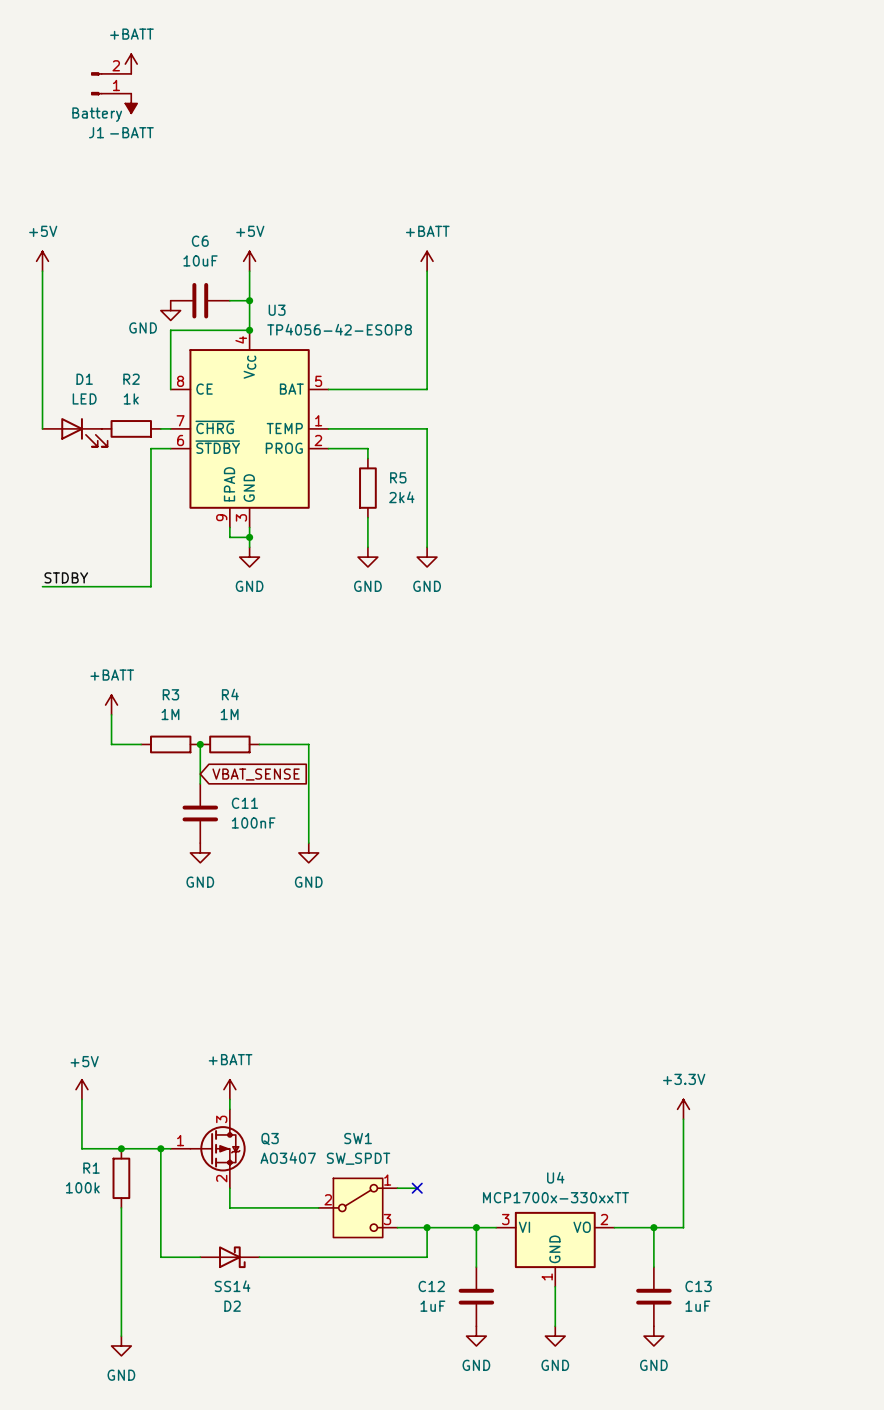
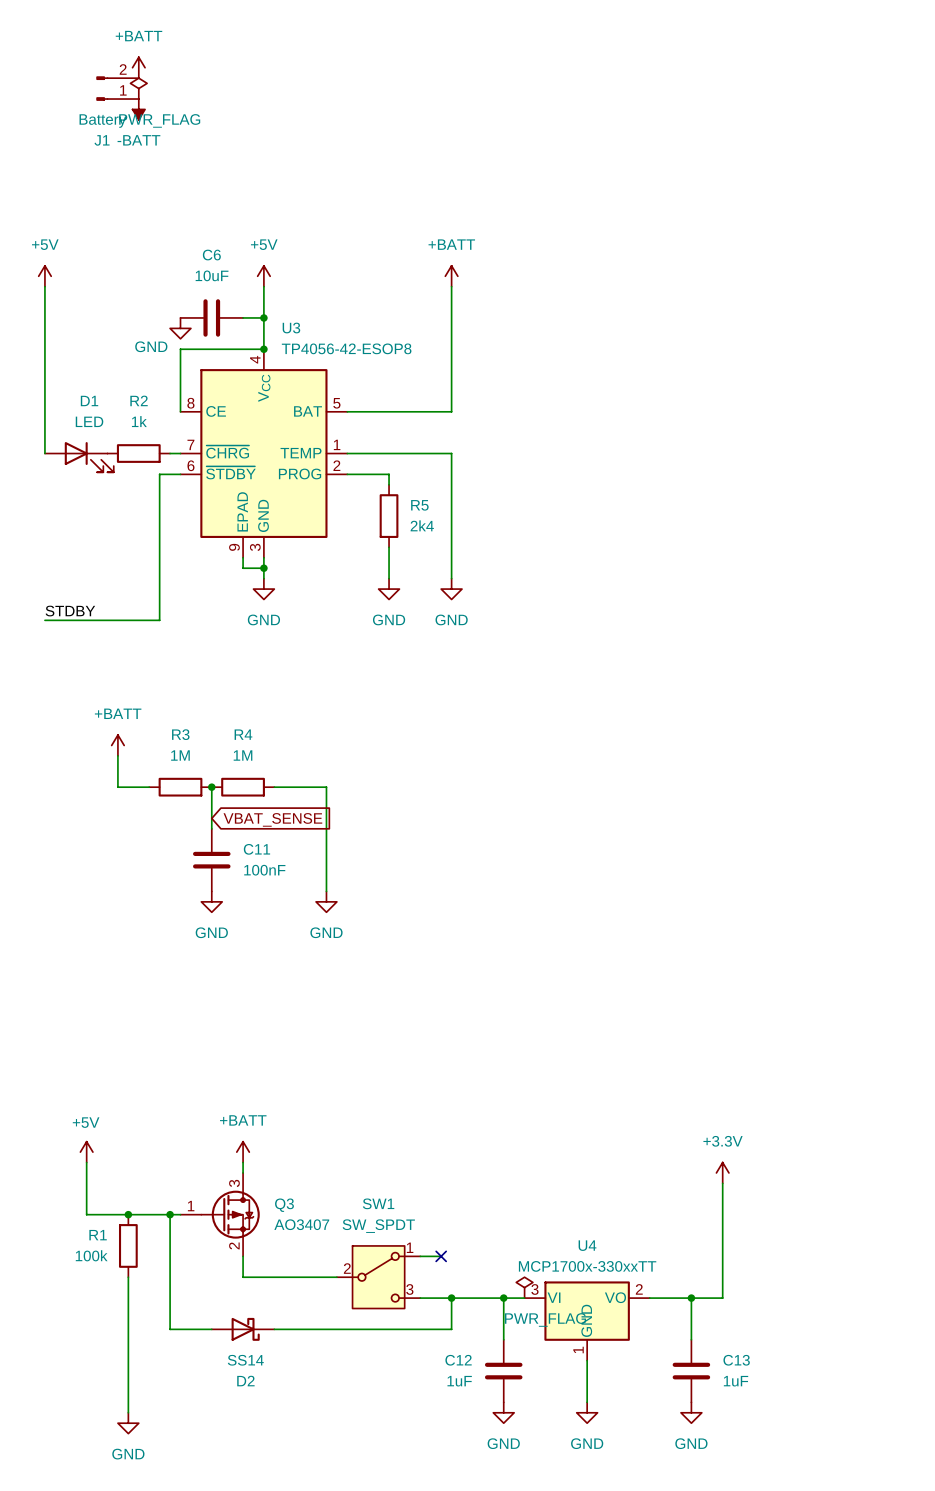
power symbol: none -> PWR_FLAG (138, 88)
power symbol: none -> PWR_FLAG (524, 1287)

